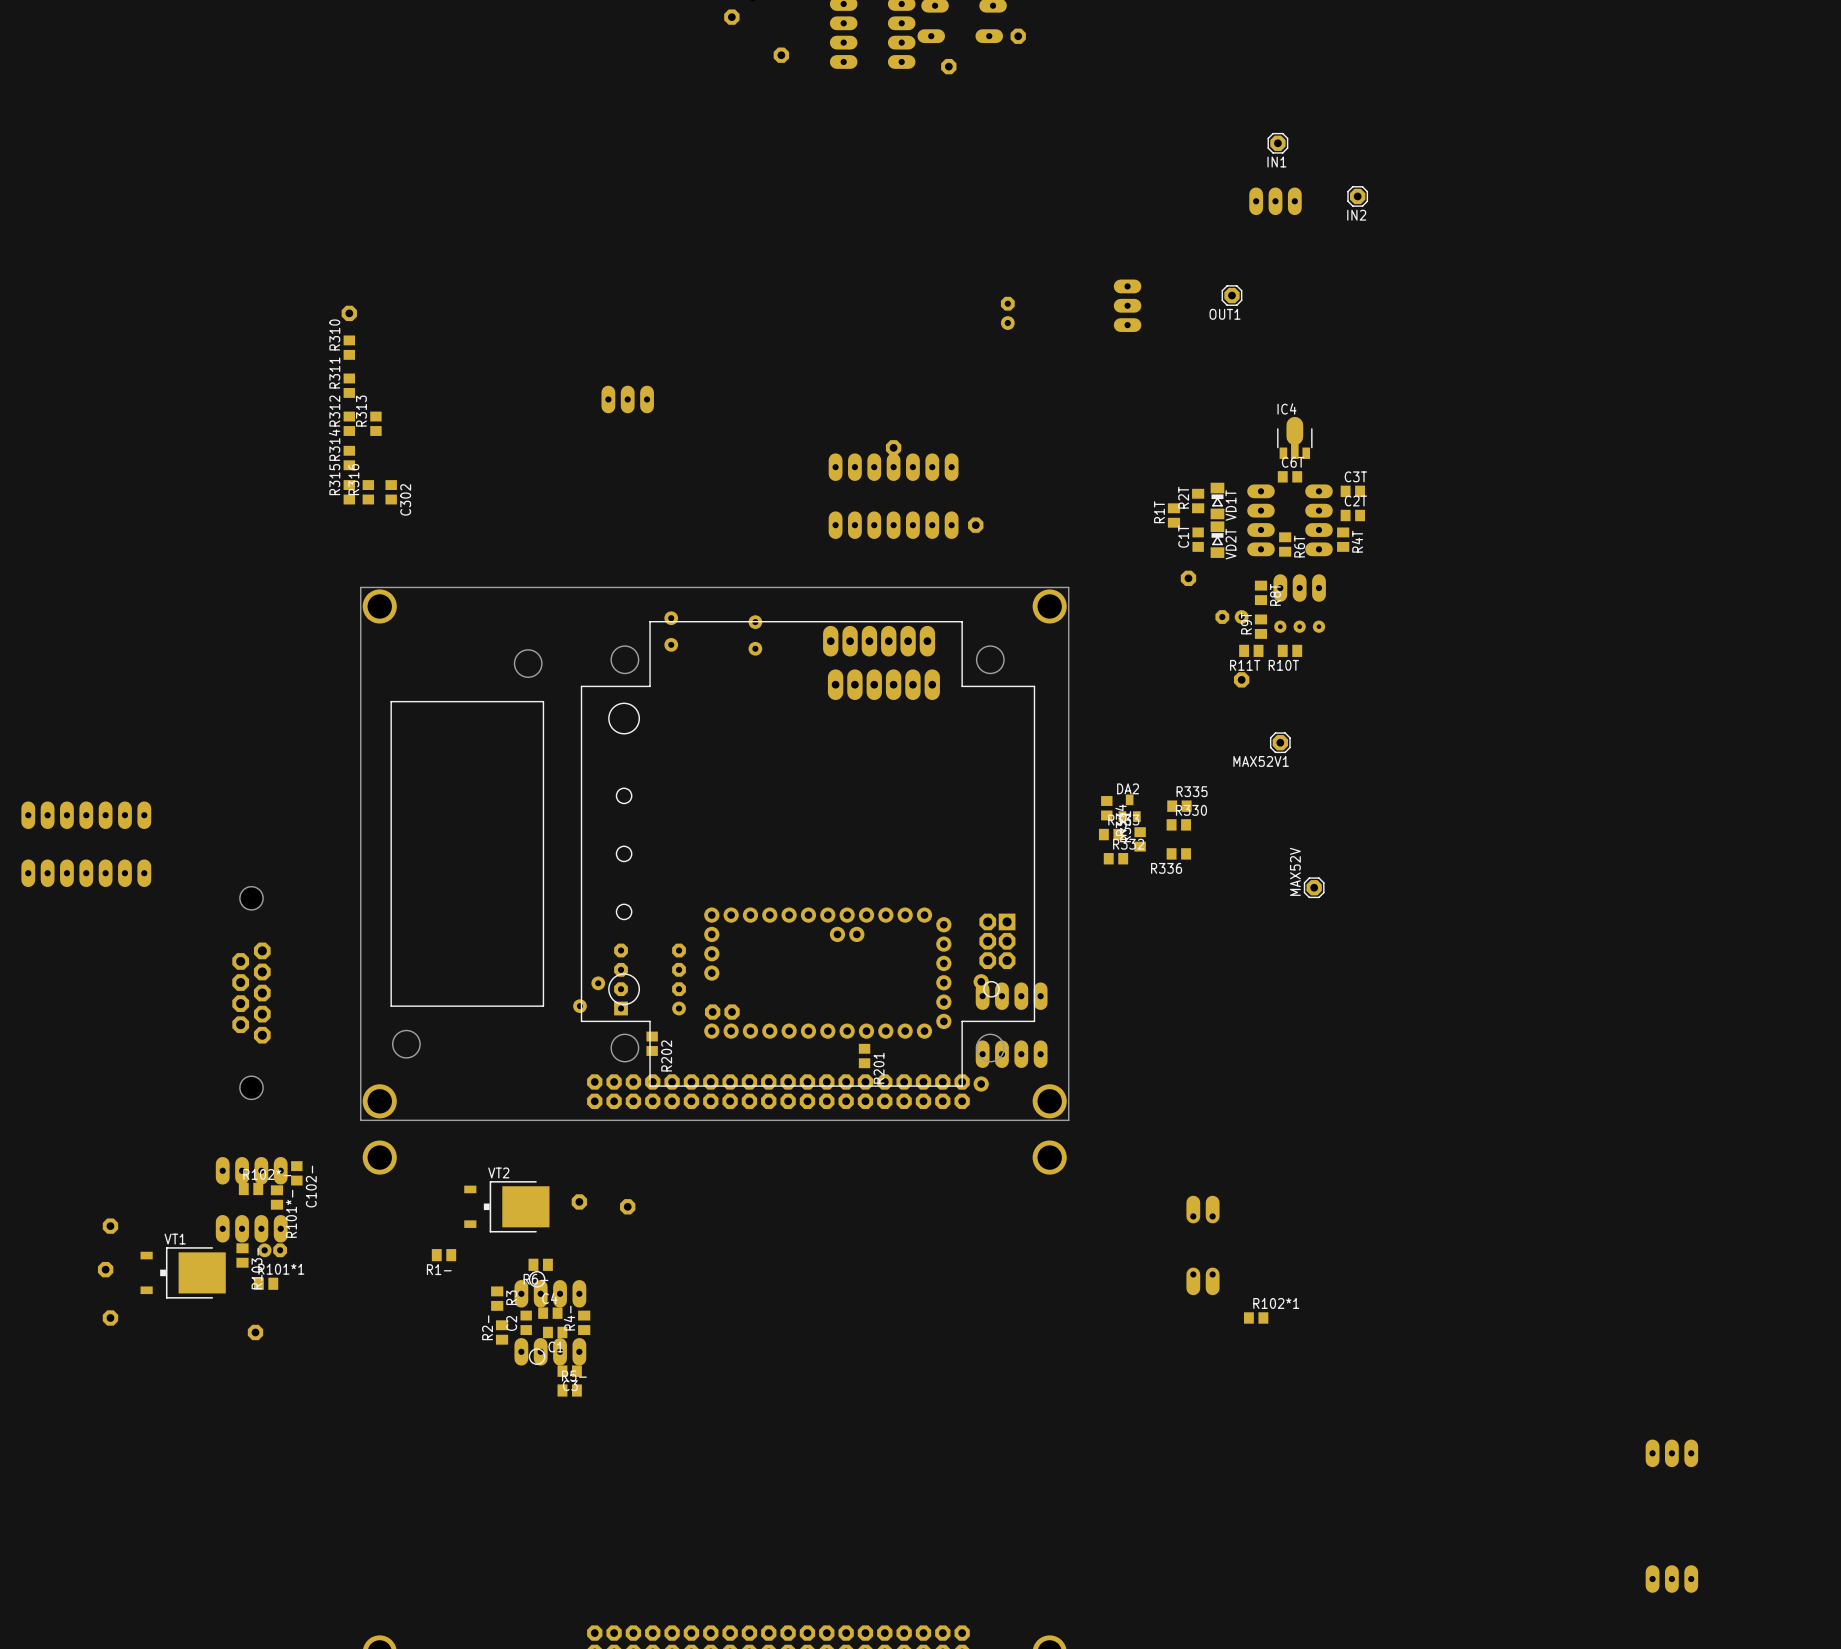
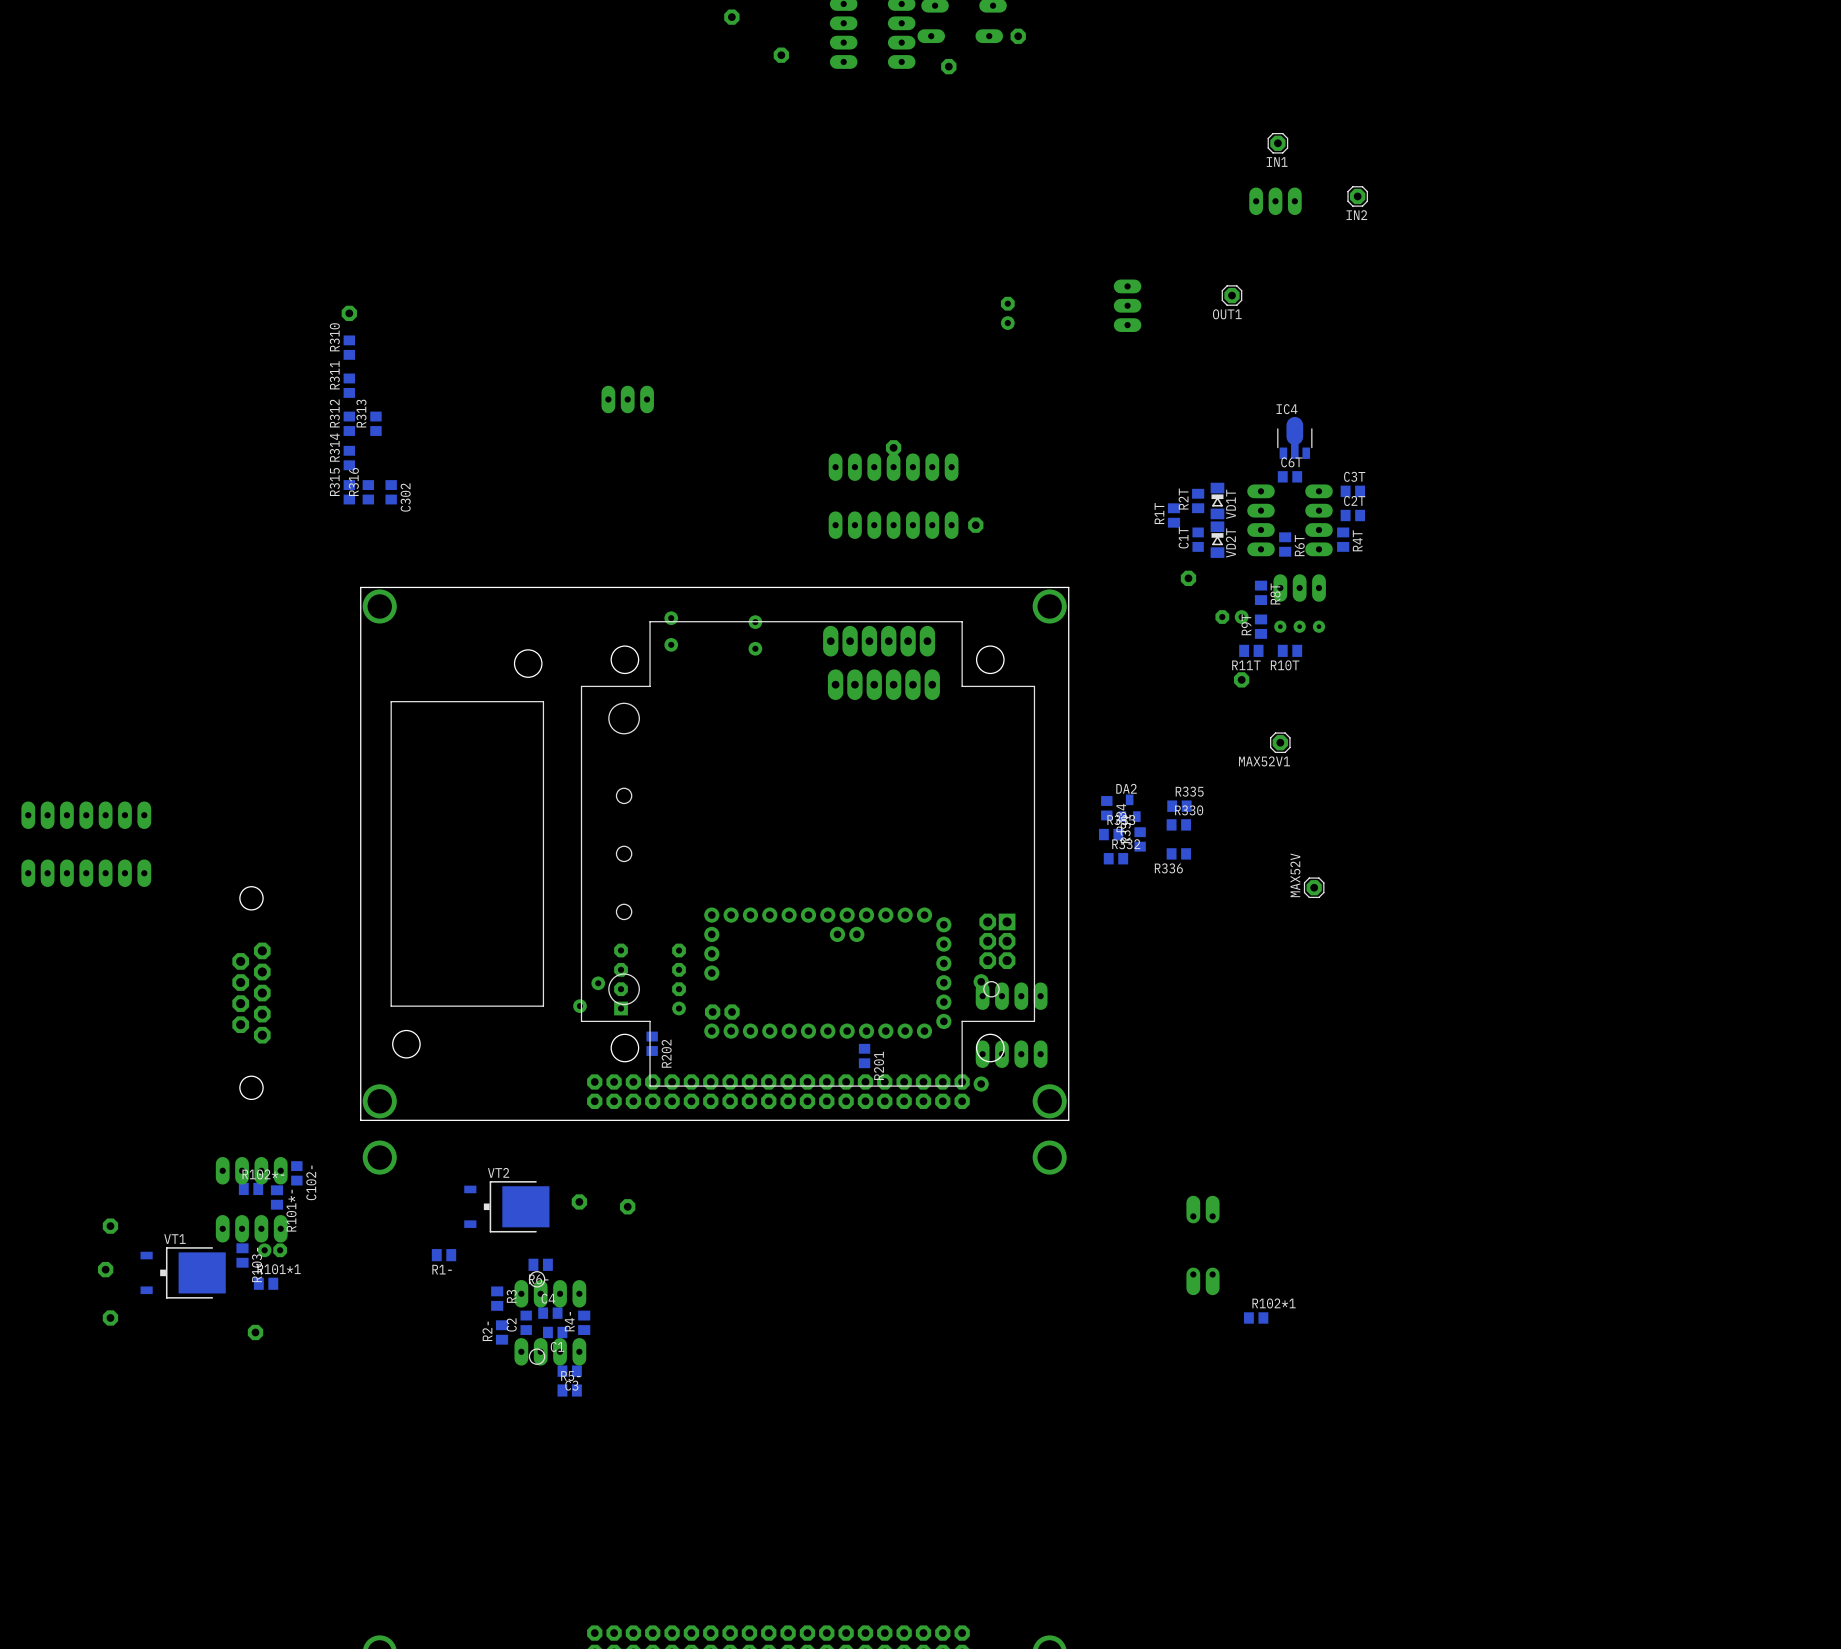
part: (1671, 1453) -> none
part: (1671, 1579) -> none

